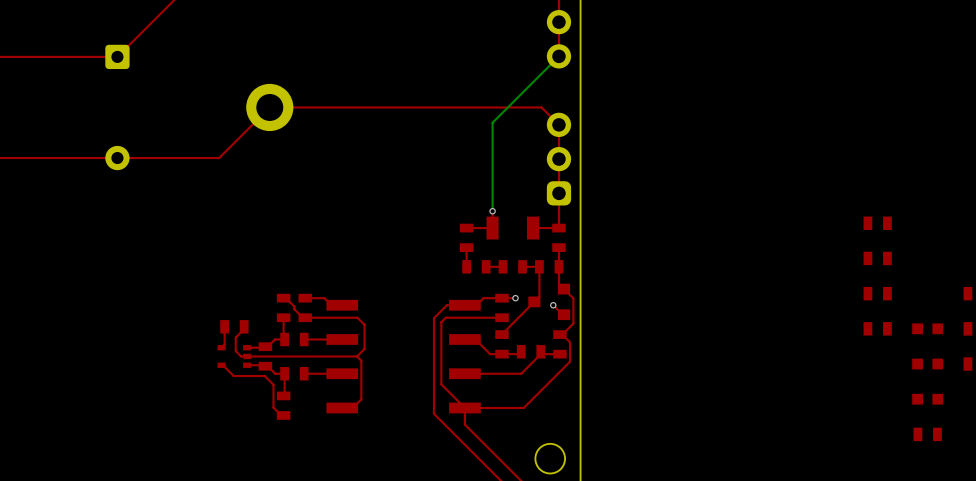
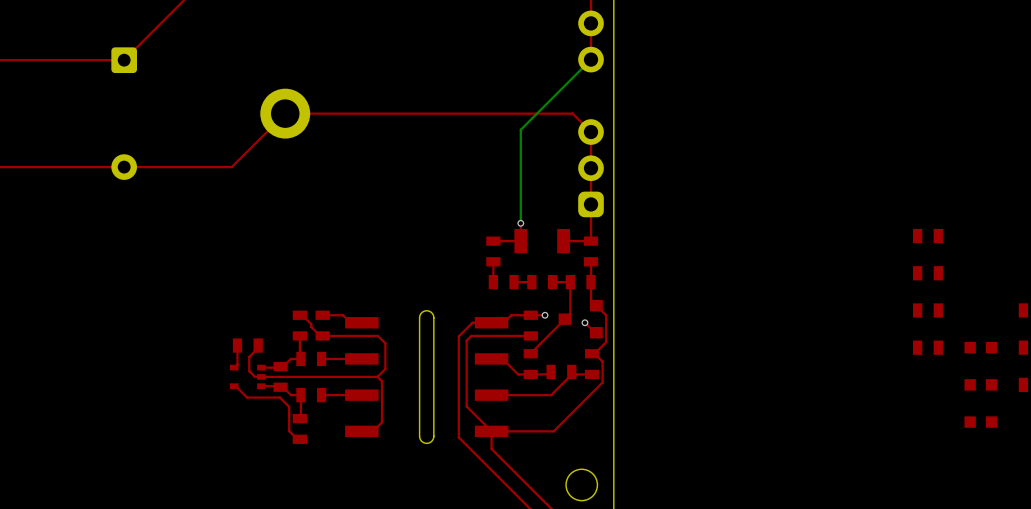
board edge: none -> (433, 317) (431, 312) (426, 310) (421, 312) (419, 316) (419, 436)
board edge: none -> (433, 317) (433, 437) (431, 441) (426, 443) (421, 441) (419, 436)
part: (927, 434) -> none

